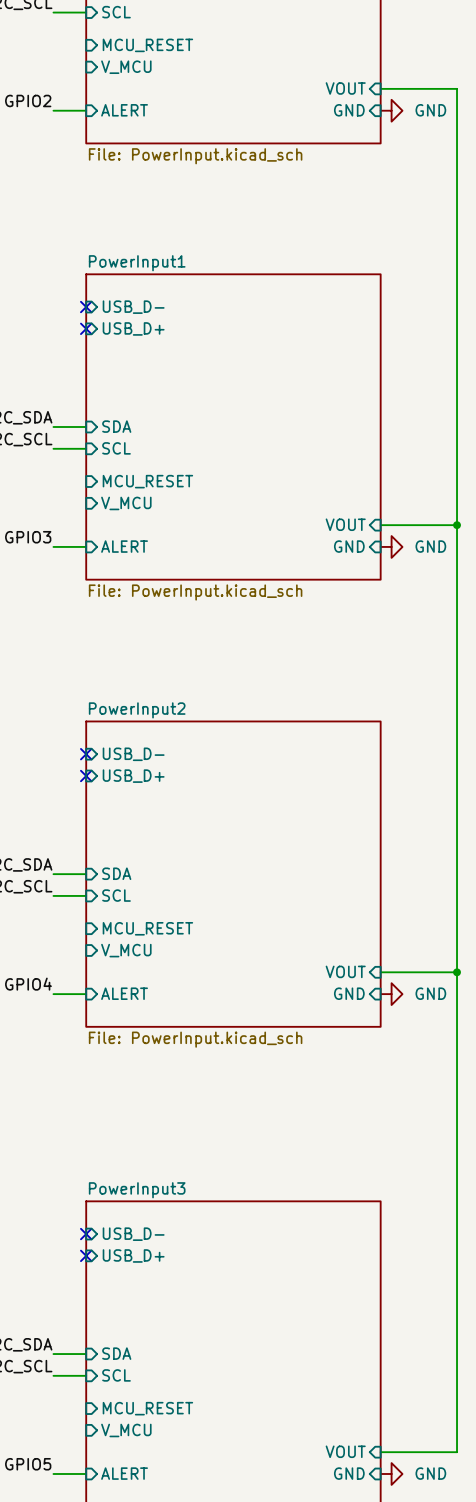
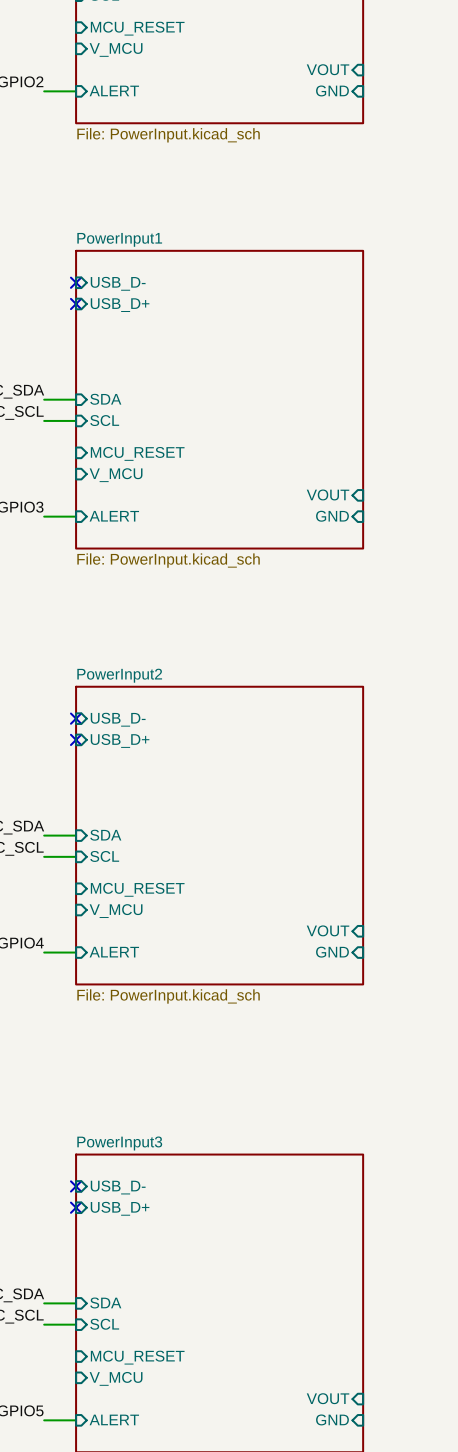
wire: (380, 88) (457, 88) (457, 1452) (380, 1452) -> none
power symbol: GND (391, 110) -> none
wire: (380, 525) (457, 525) -> none
junction: (457, 525) -> none
power symbol: GND (391, 546) -> none
wire: (380, 972) (457, 972) -> none
junction: (457, 972) -> none
power symbol: GND (391, 994) -> none
power symbol: GND (391, 1473) -> none

